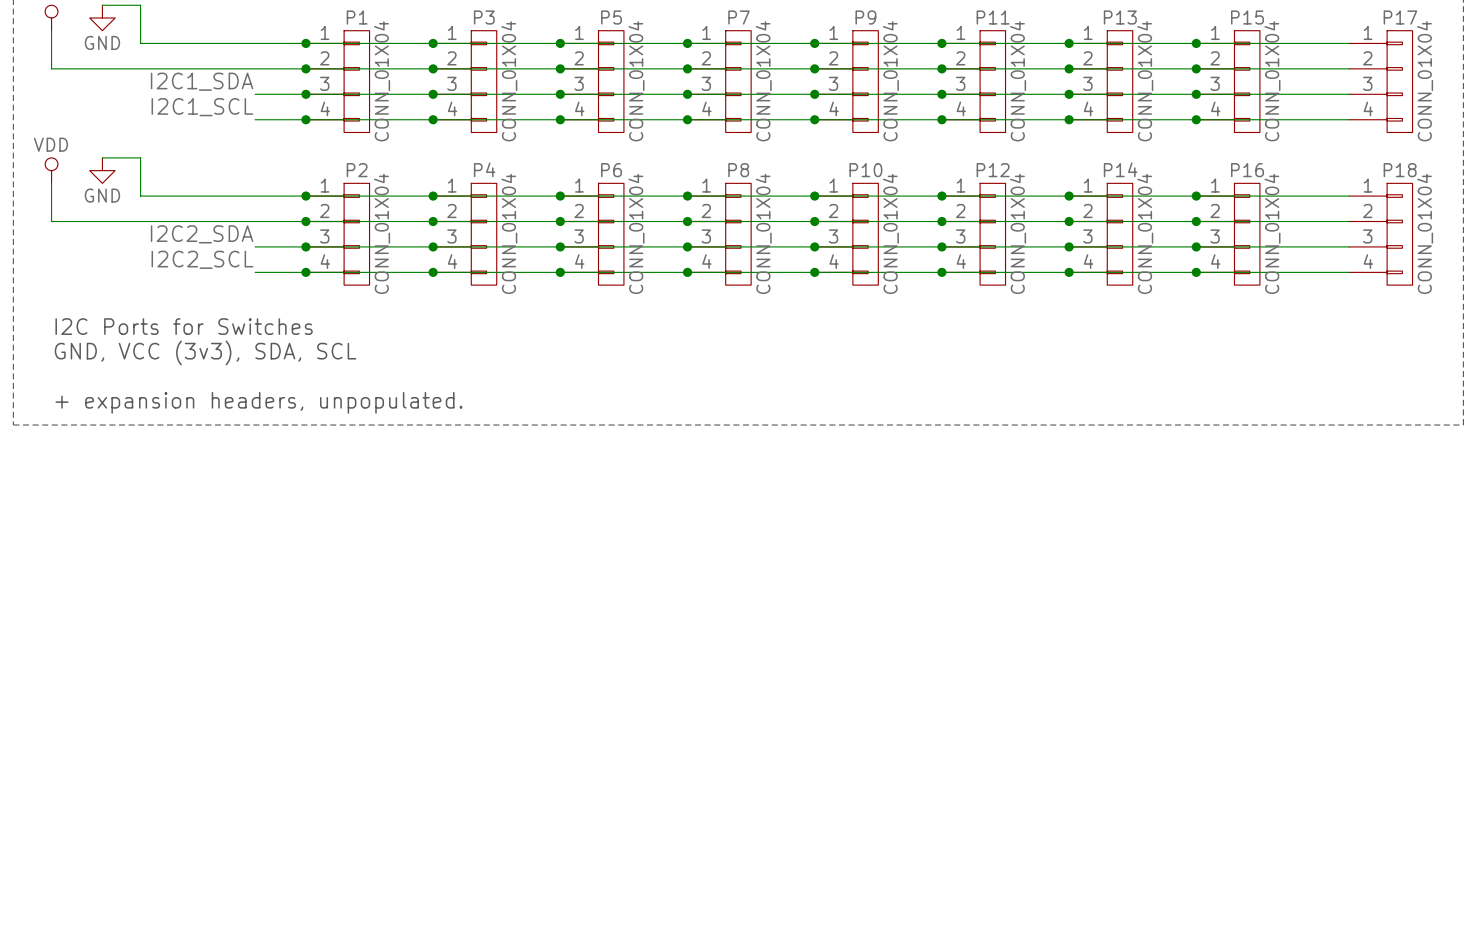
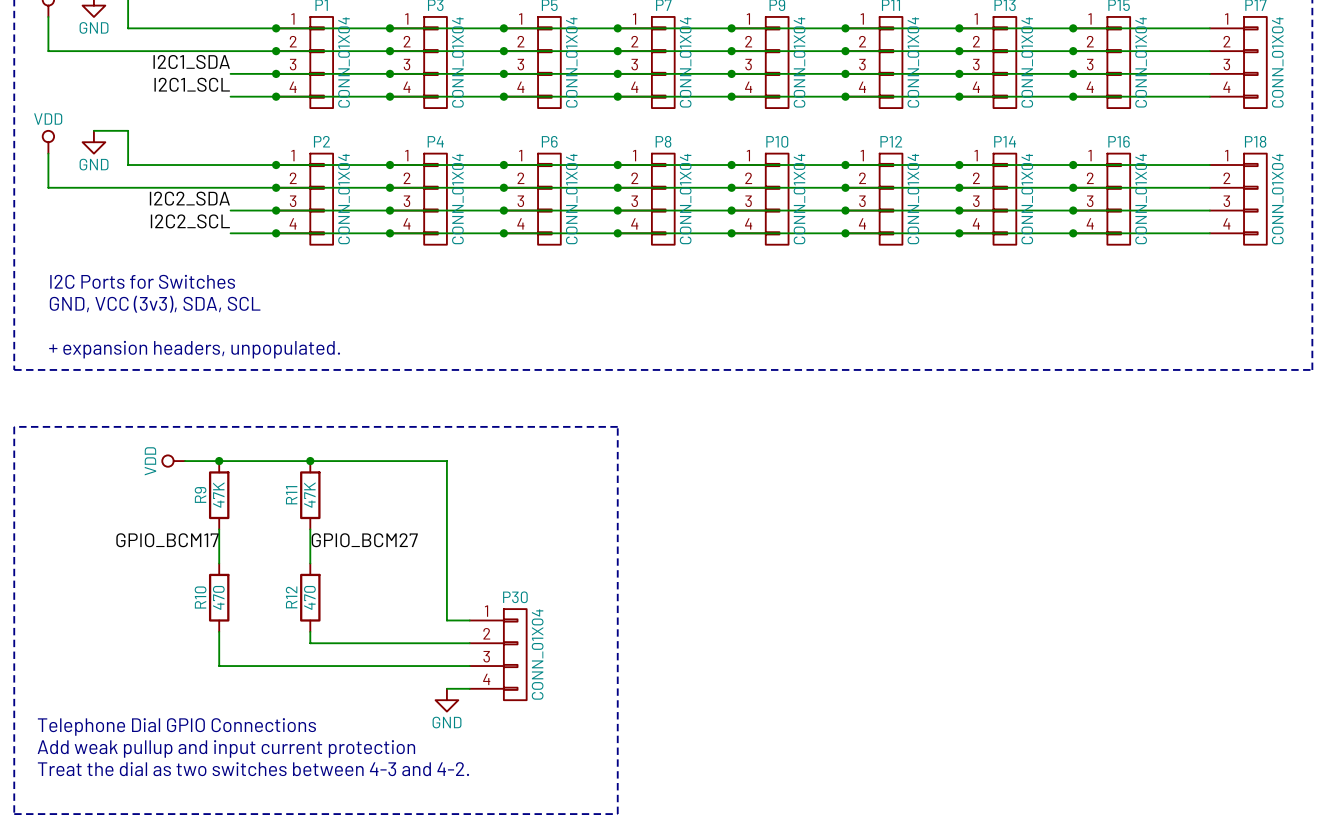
line: none -> (14, 426) (617, 426) (617, 814) (14, 814) (14, 426)
power symbol: none -> VDD (173, 461)
wire: none -> (185, 461) (446, 461) (446, 620) (469, 620)
junction: none -> (219, 461)
junction: none -> (310, 461)
R9: none -> 47K (219, 495)
R11: none -> 47K (310, 495)
wire: none -> (219, 529) (219, 563)
wire: none -> (310, 529) (310, 563)
label: none -> GPIO_BCM17 (167, 540)
label: none -> GPIO_BCM27 (364, 540)
R10: none -> 470 (219, 597)
R12: none -> 470 (310, 597)
wire: none -> (219, 631) (219, 666) (469, 666)
wire: none -> (310, 631) (310, 643) (469, 643)
P30: none -> CONN_01X04 (498, 654)
wire: none -> (446, 688) (469, 688)
power symbol: none -> GND (446, 700)
text: none -> Telephone Dial GPIO Connections (176, 726)
text: none -> Add weak pullup and input current protection (226, 748)
text: none -> Treat the dial as two switches between 4-3 and 4-2. (253, 769)

